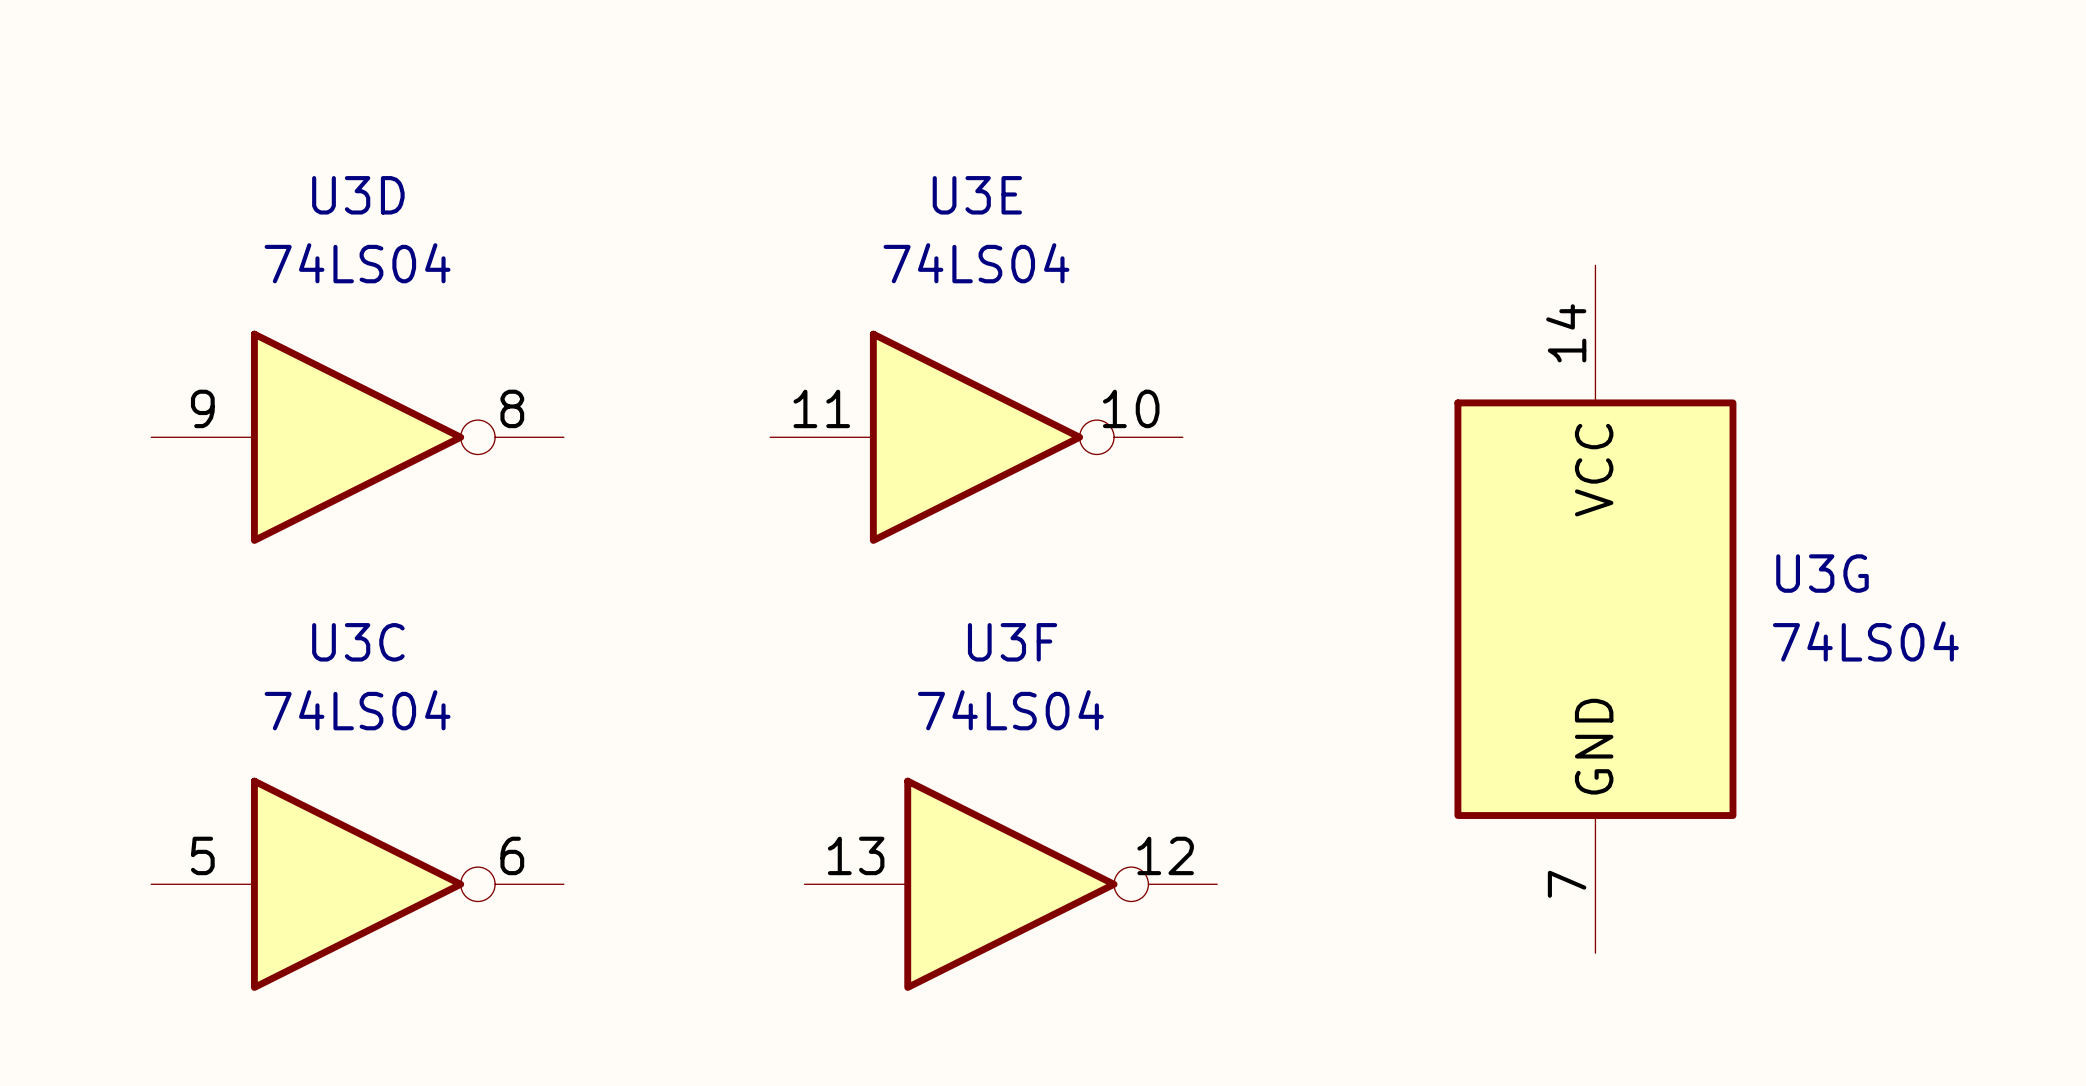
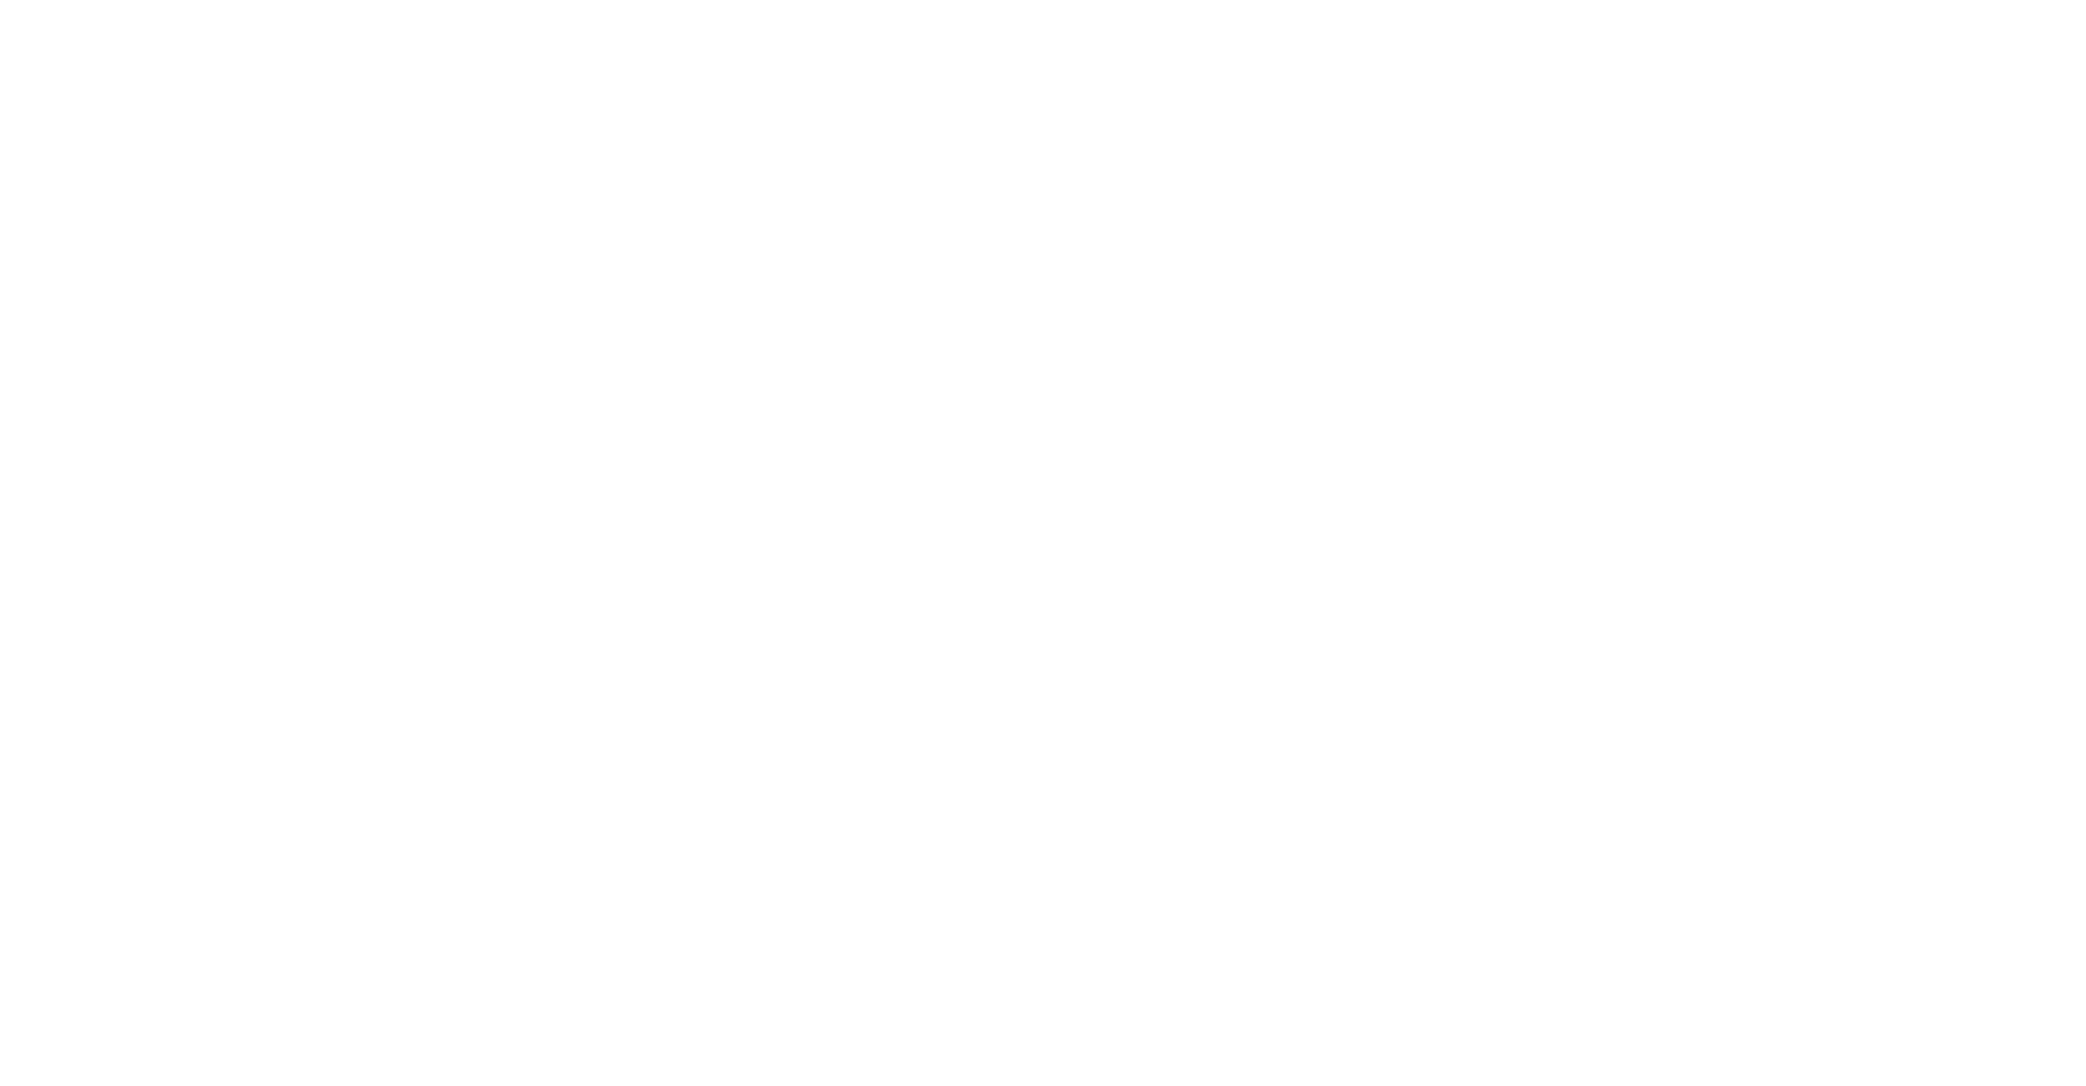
U3D: 74LS04 (357, 437) -> none
U3E: 74LS04 (976, 437) -> none
U3G: 74LS04 (1595, 609) -> none
U3C: 74LS04 (357, 884) -> none
U3F: 74LS04 (1010, 884) -> none

